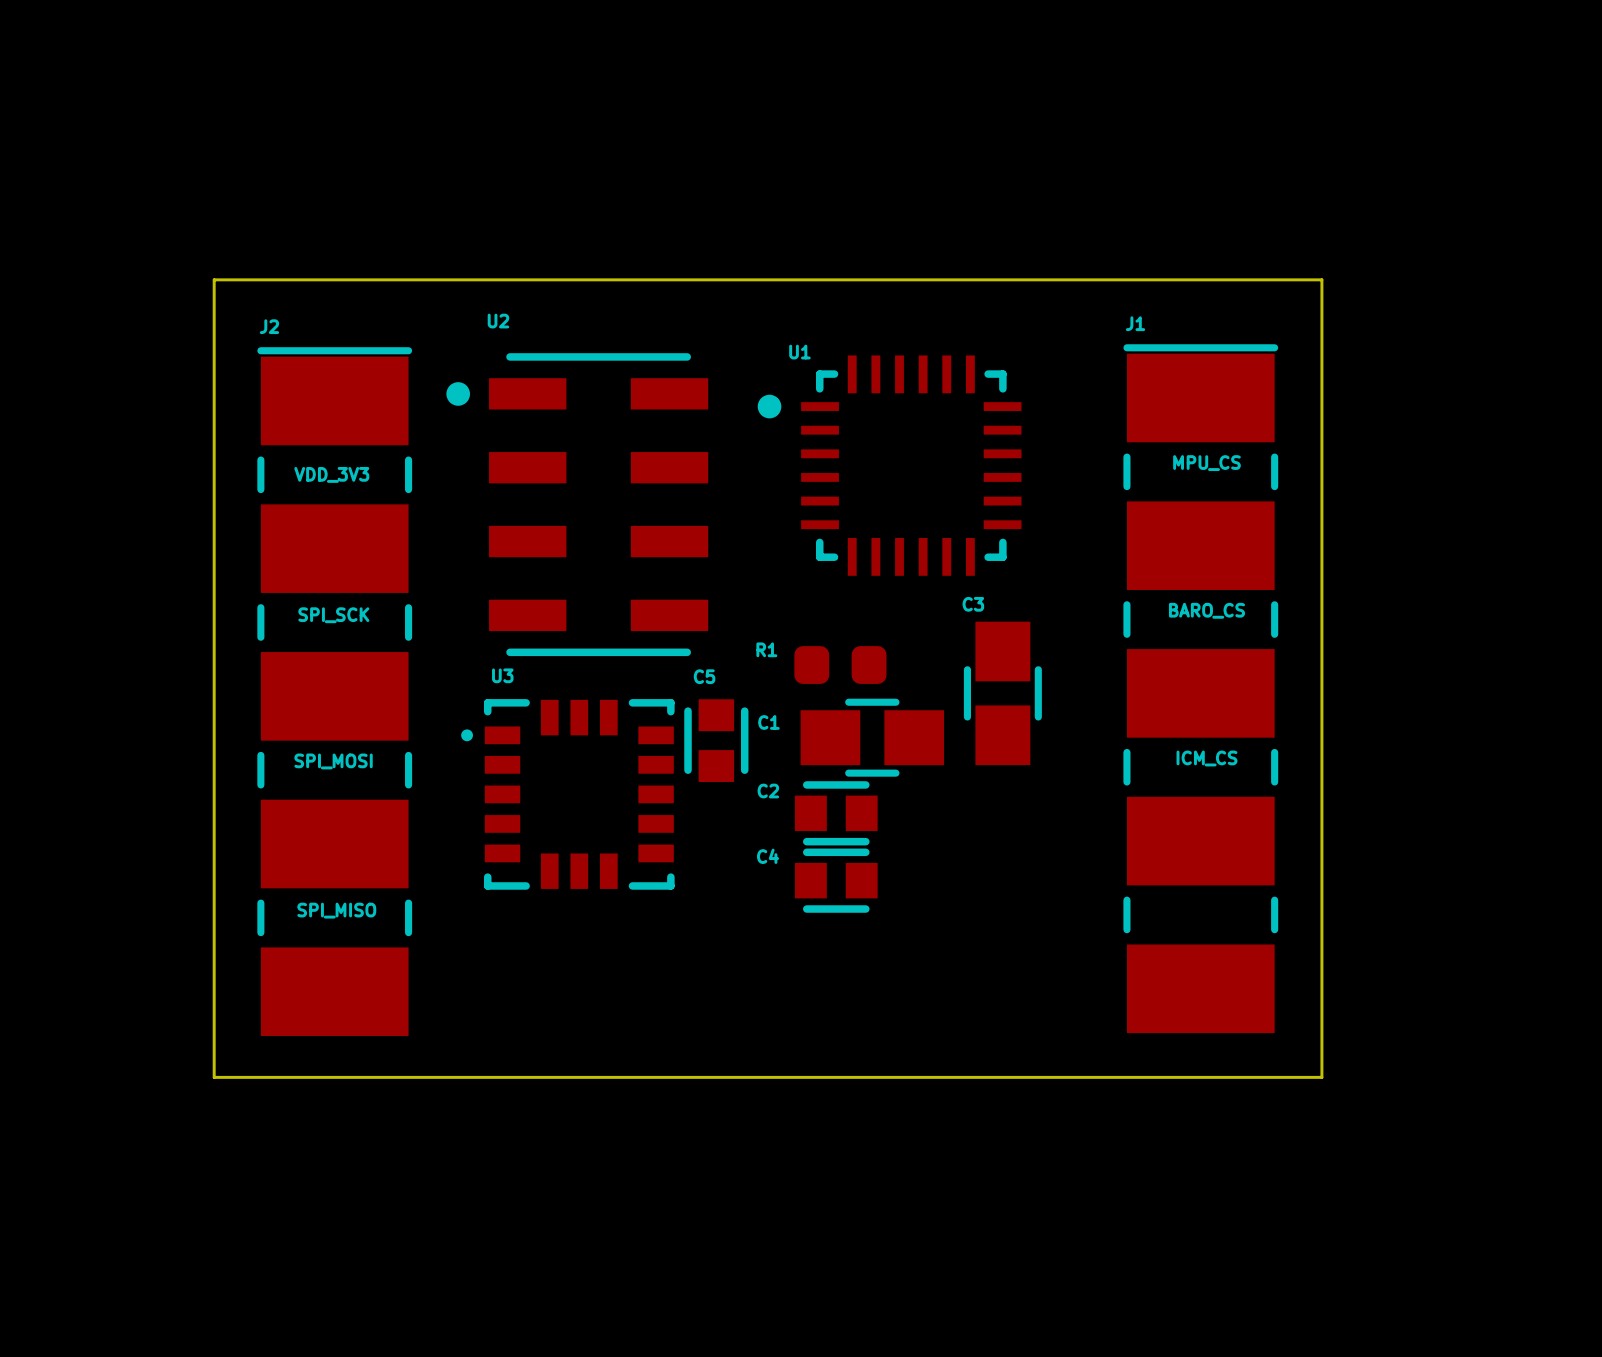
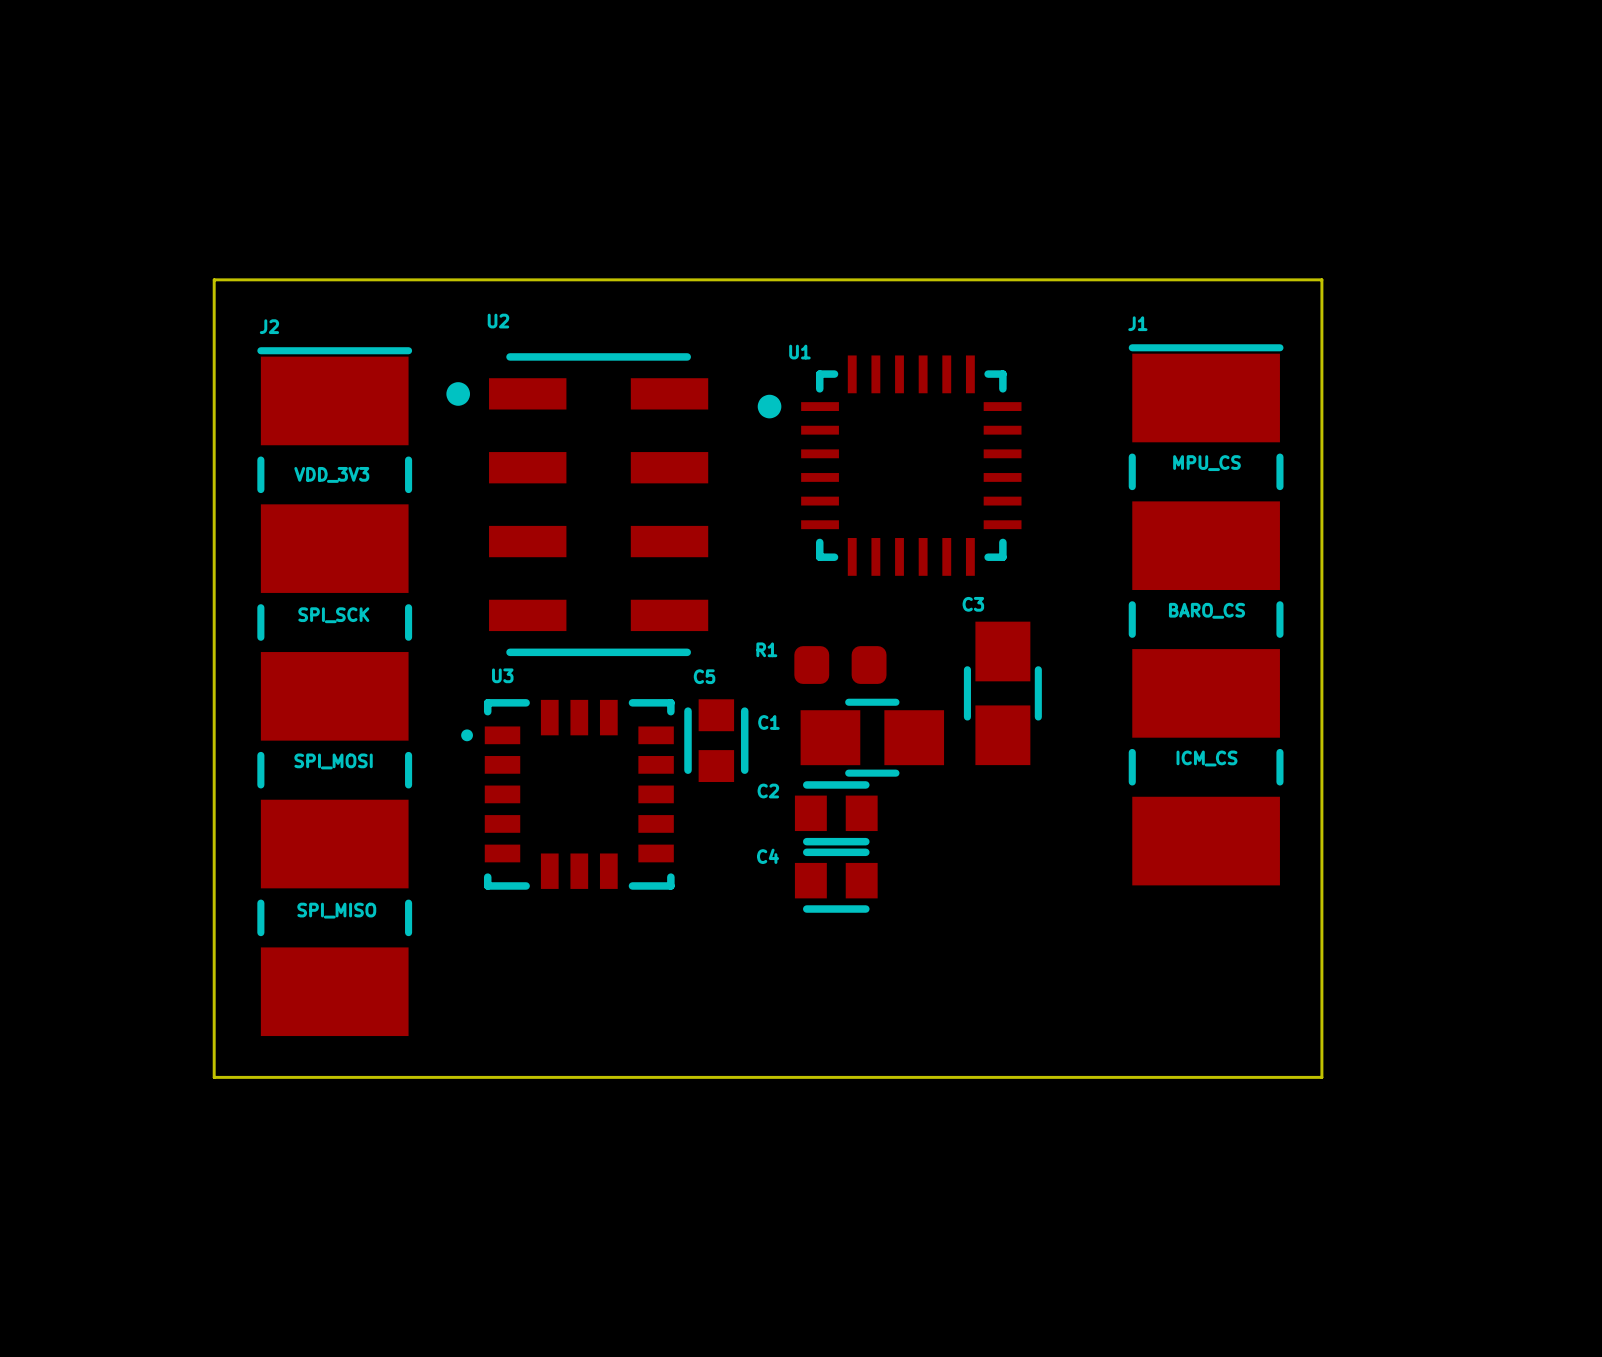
J1 footprint: [1123, 344, 1279, 1034] -> [1128, 344, 1284, 886]

